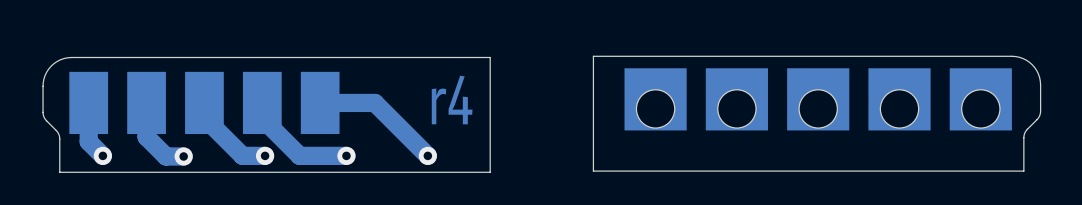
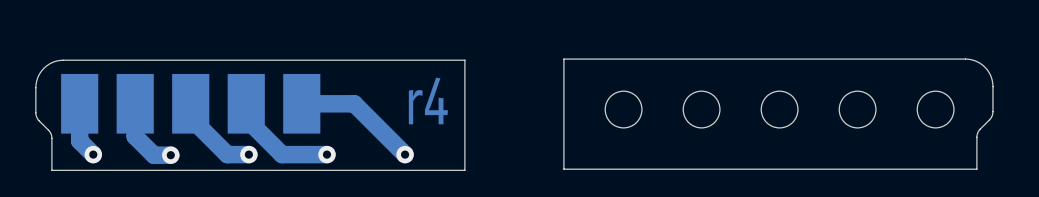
part: (655, 99) -> none
part: (736, 99) -> none
part: (818, 99) -> none
part: (899, 99) -> none
part: (980, 99) -> none

